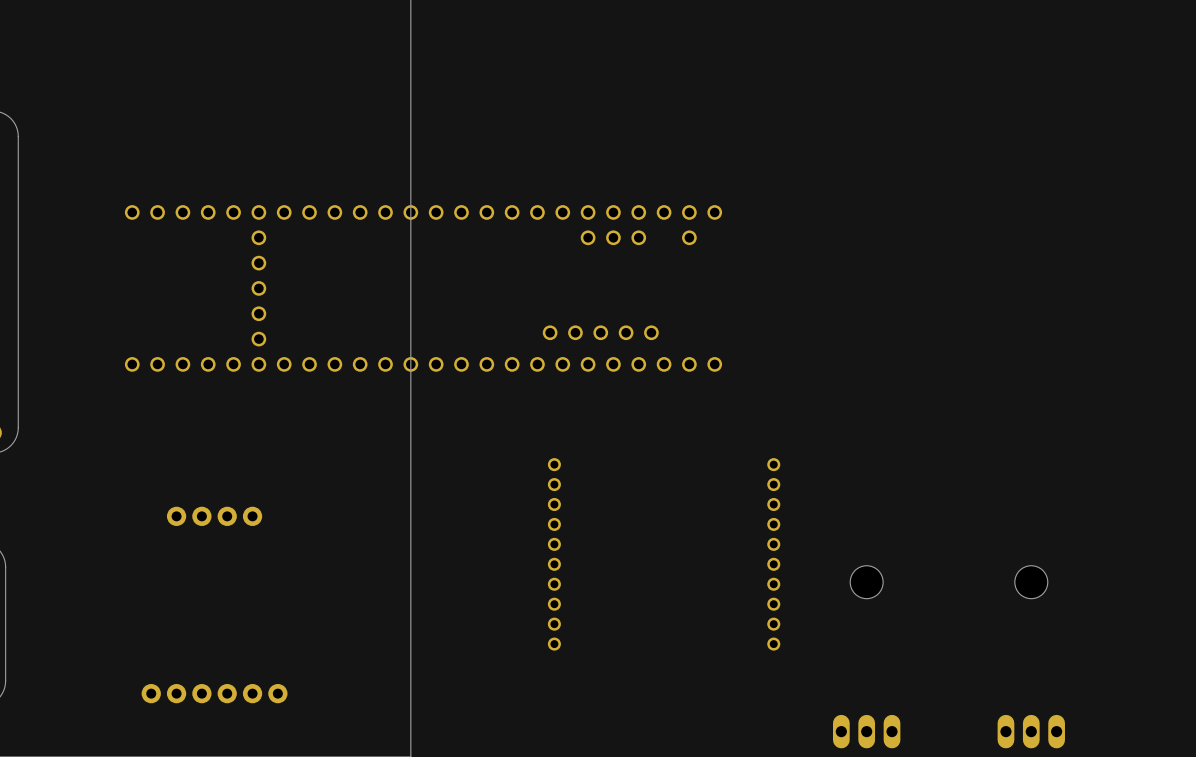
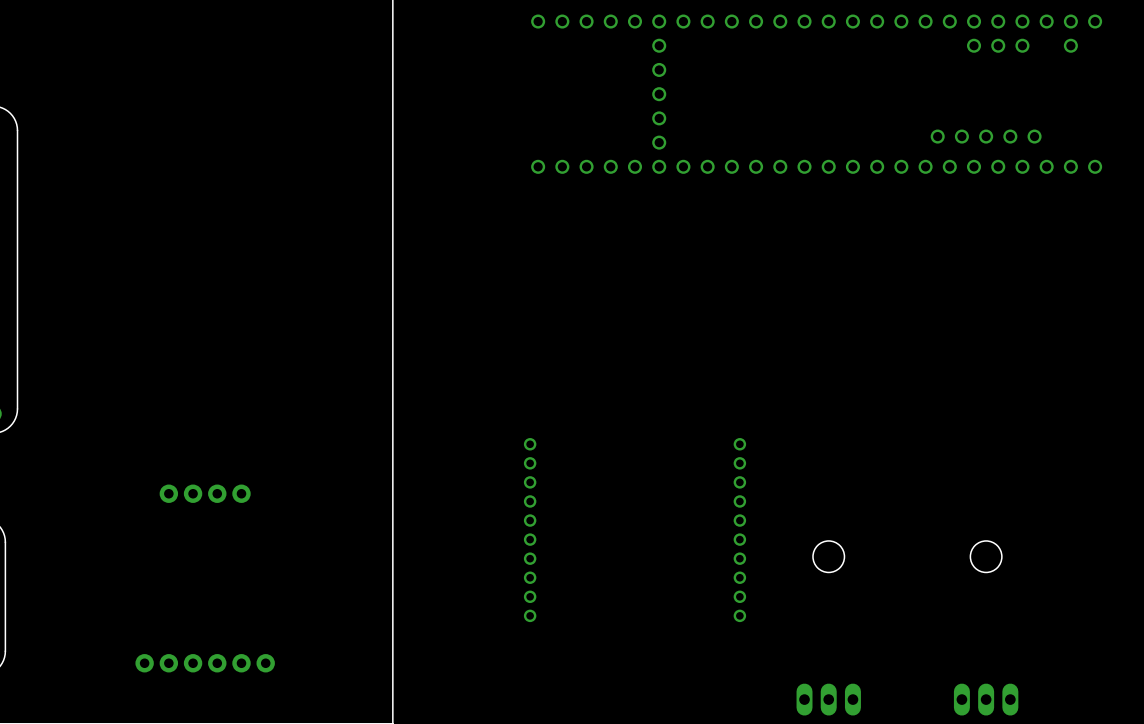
part: none -> (816, 94)
part: (423, 288) -> none

